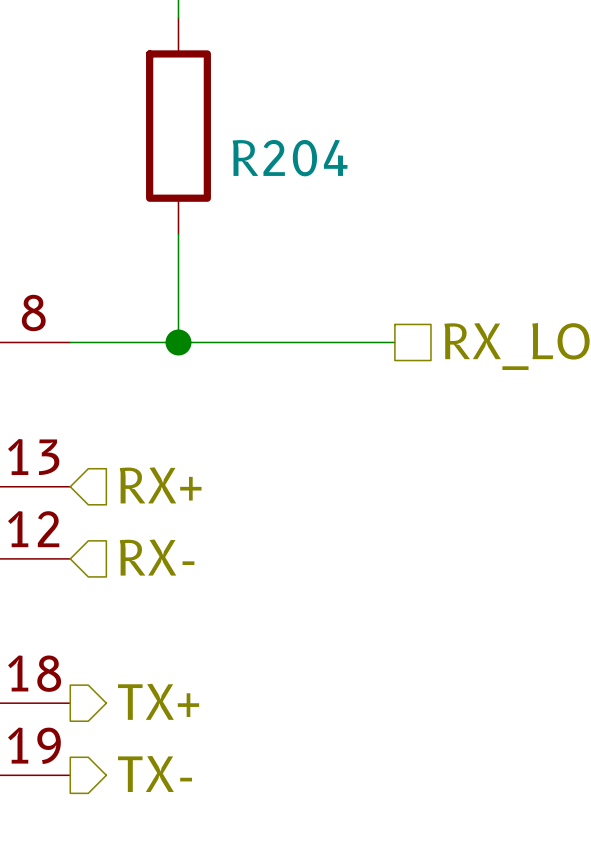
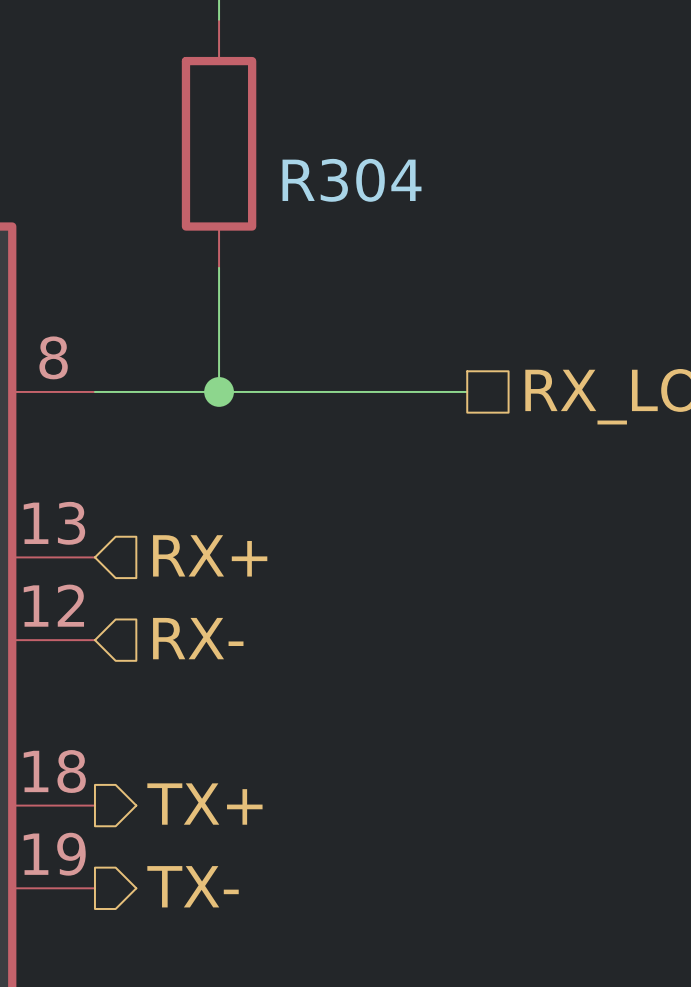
R204 name: R204 (290, 158) -> R304 (352, 180)

